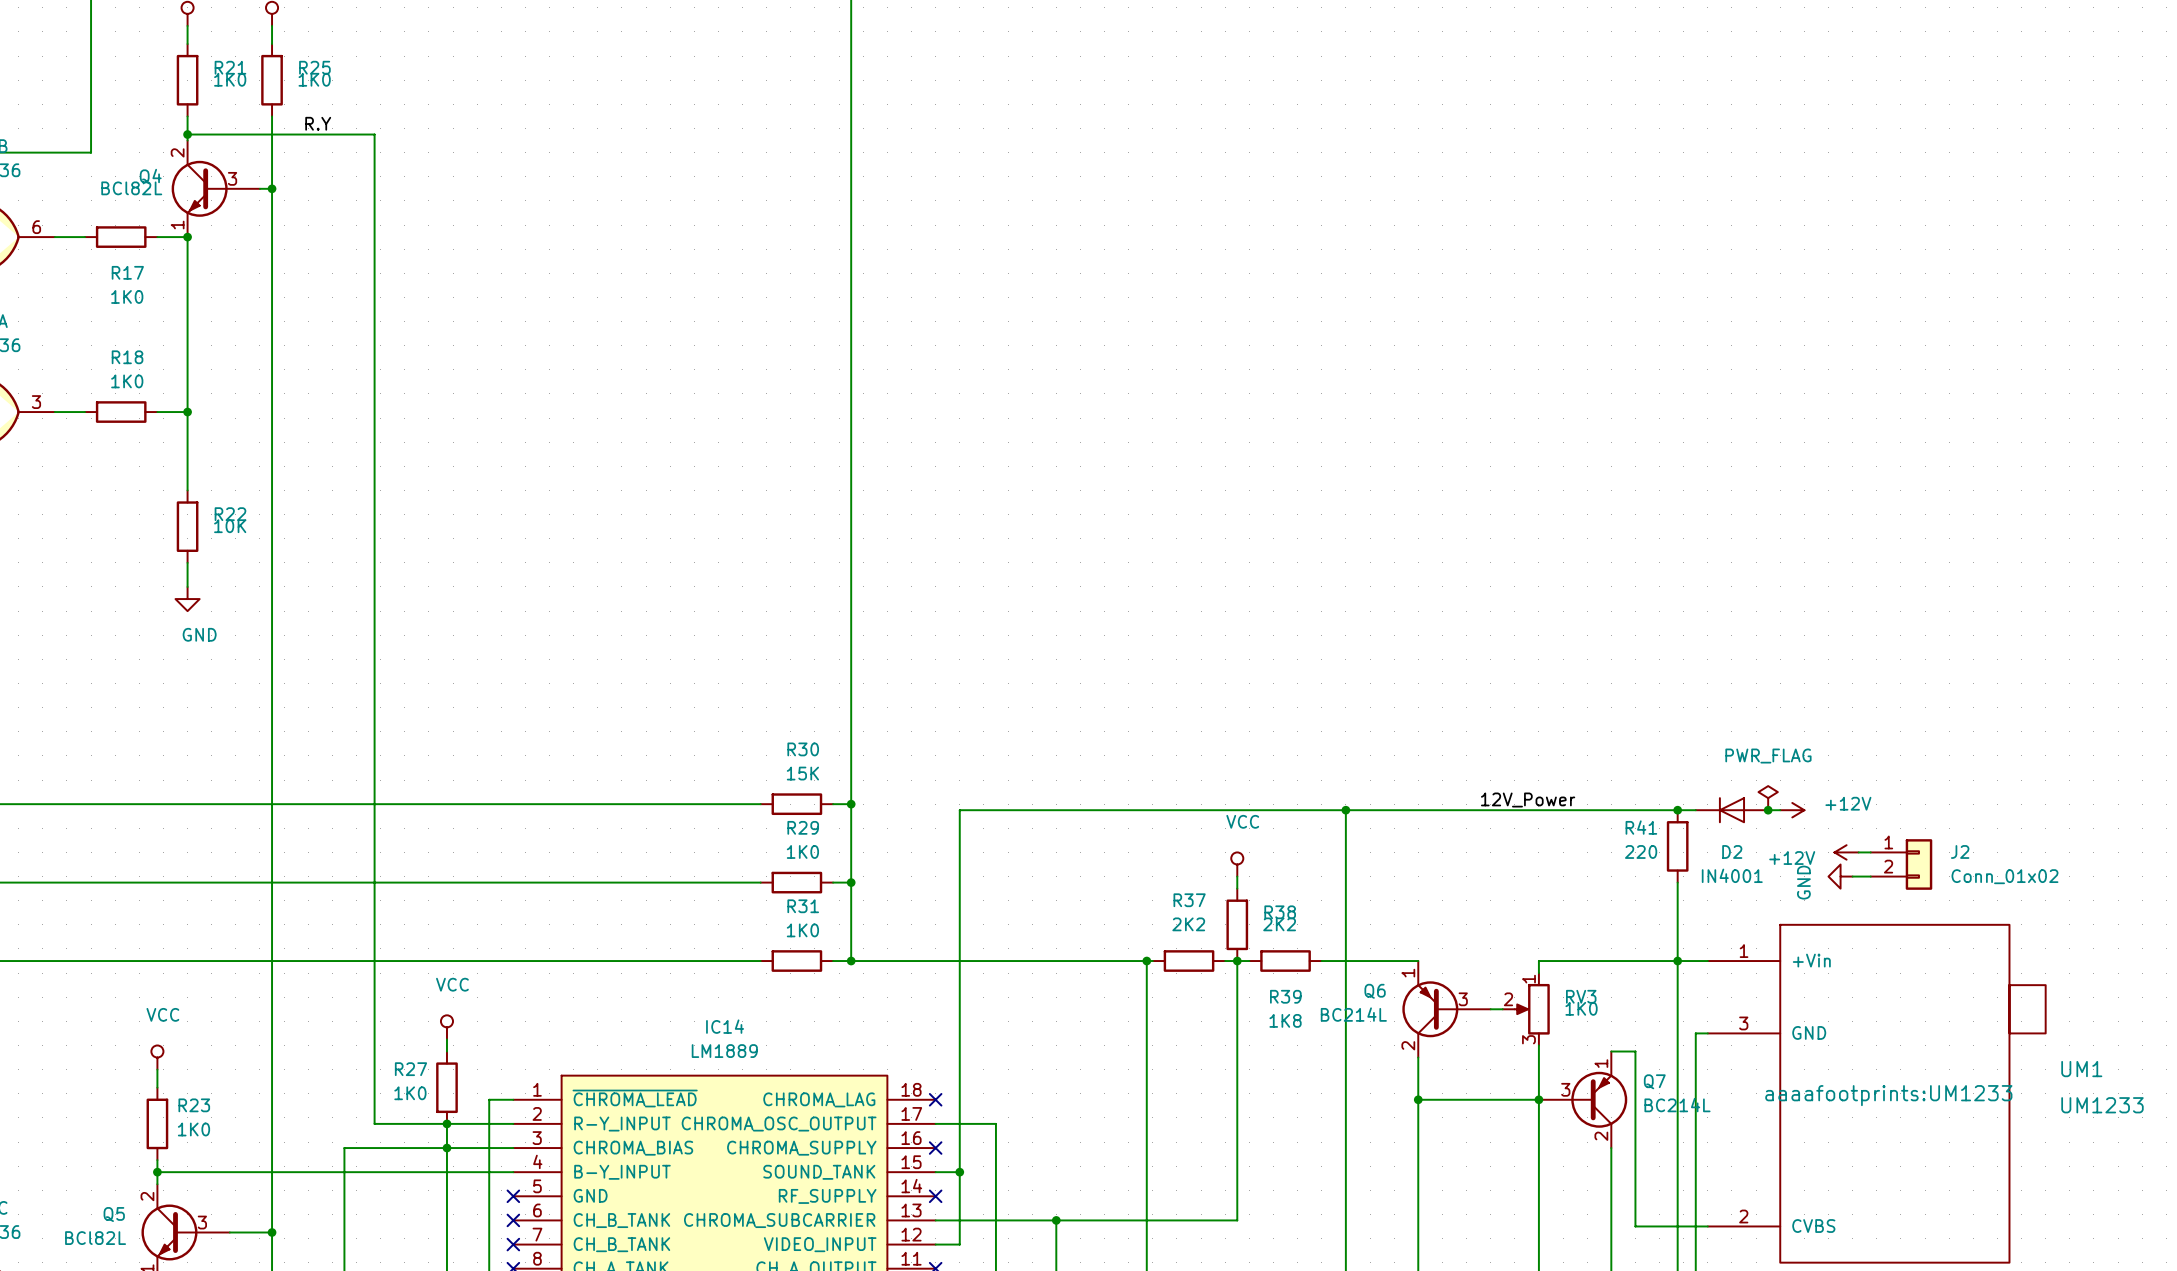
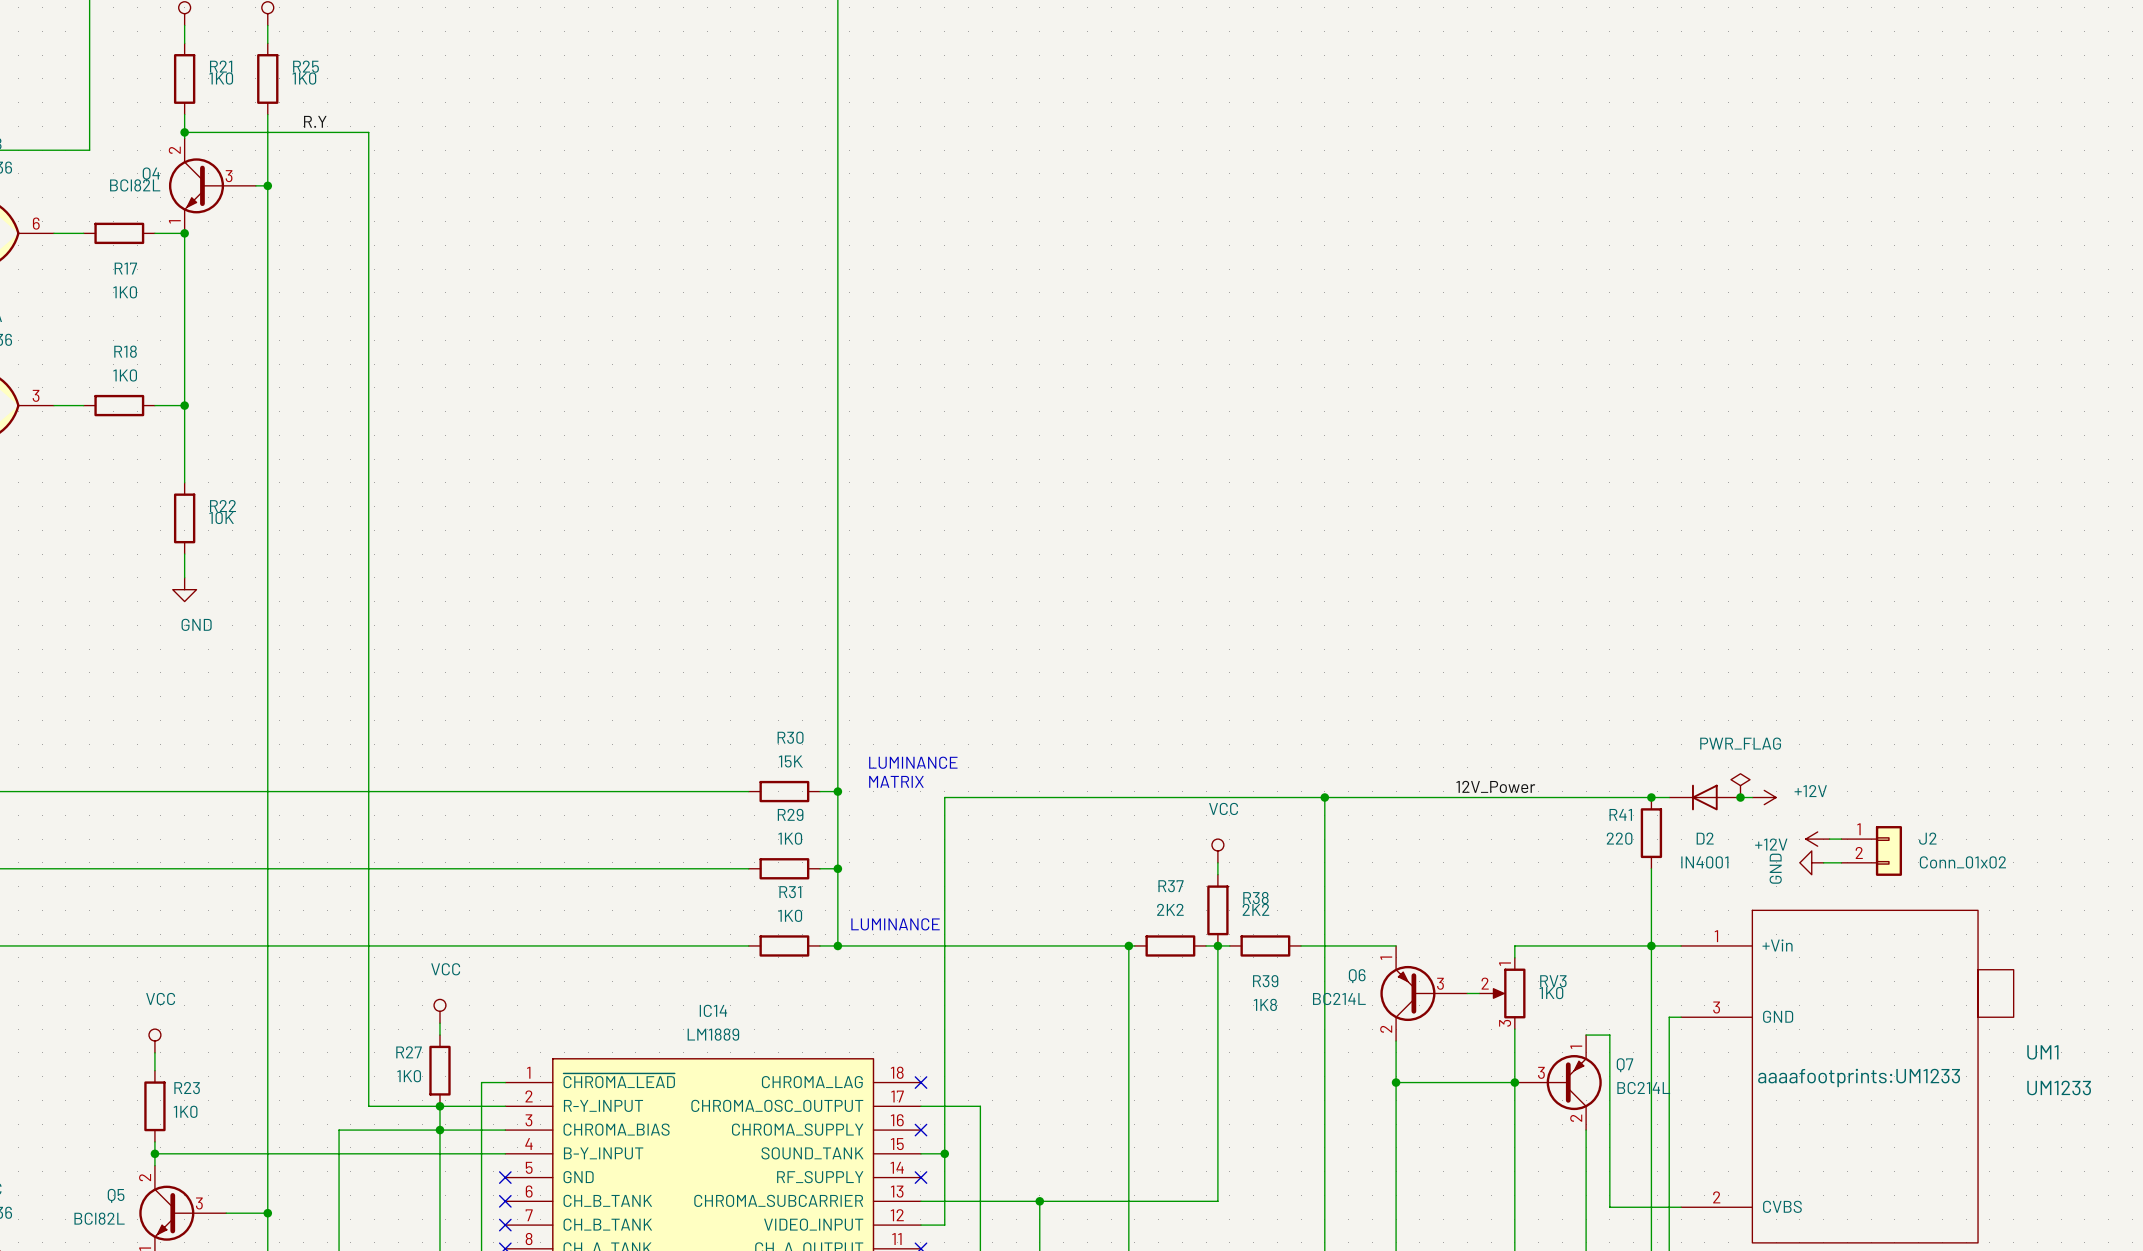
text: none -> LUMINANCE (913, 762)
text: none -> MATRIX (896, 781)
text: none -> LUMINANCE (895, 924)

